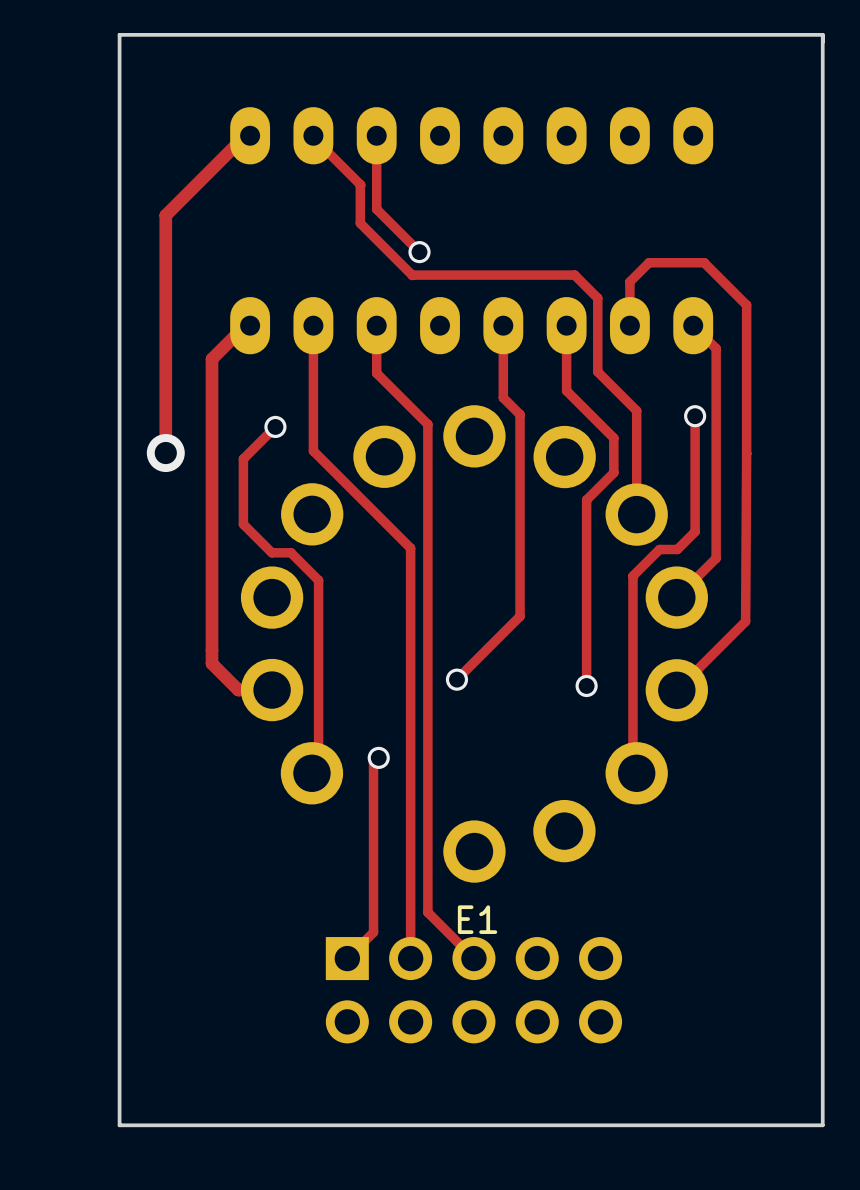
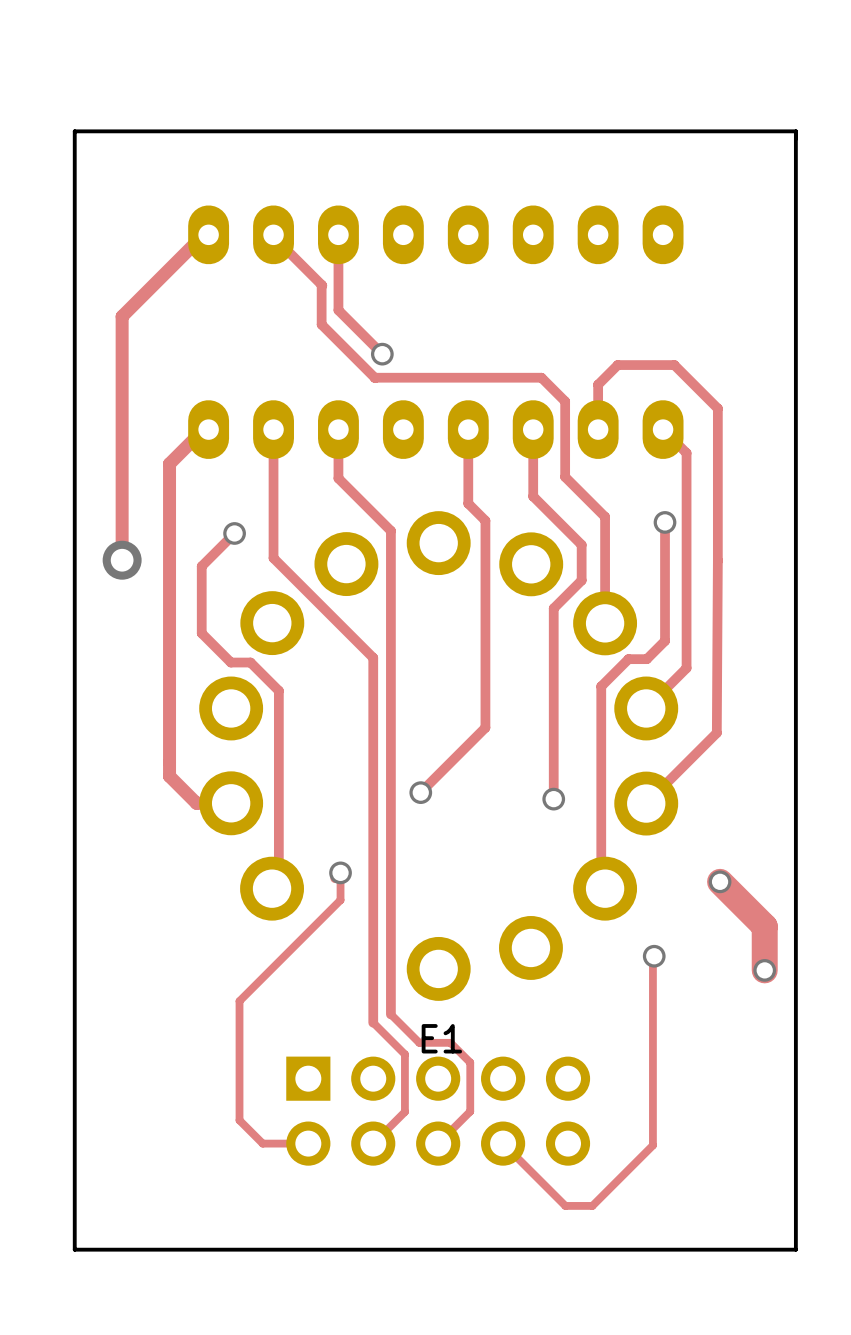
track: none -> (340, 872) (340, 900) (239, 1001) (239, 1120) (262, 1143) (308, 1143)
track: (373, 763) (373, 932) (347, 958) -> none
track: none -> (720, 881) (764, 926) (764, 970)
via: none -> (720, 881)
track: none -> (654, 956) (652, 1145) (592, 1205) (565, 1205) (503, 1143)
via: none -> (654, 956)
via: none -> (764, 970)
track: (427, 895) (427, 912) (473, 958) -> (390, 1014) (419, 1042) (450, 1042) (470, 1062) (470, 1111) (438, 1143)
track: (410, 903) (410, 958) -> (373, 1022) (404, 1054) (404, 1111) (373, 1143)

